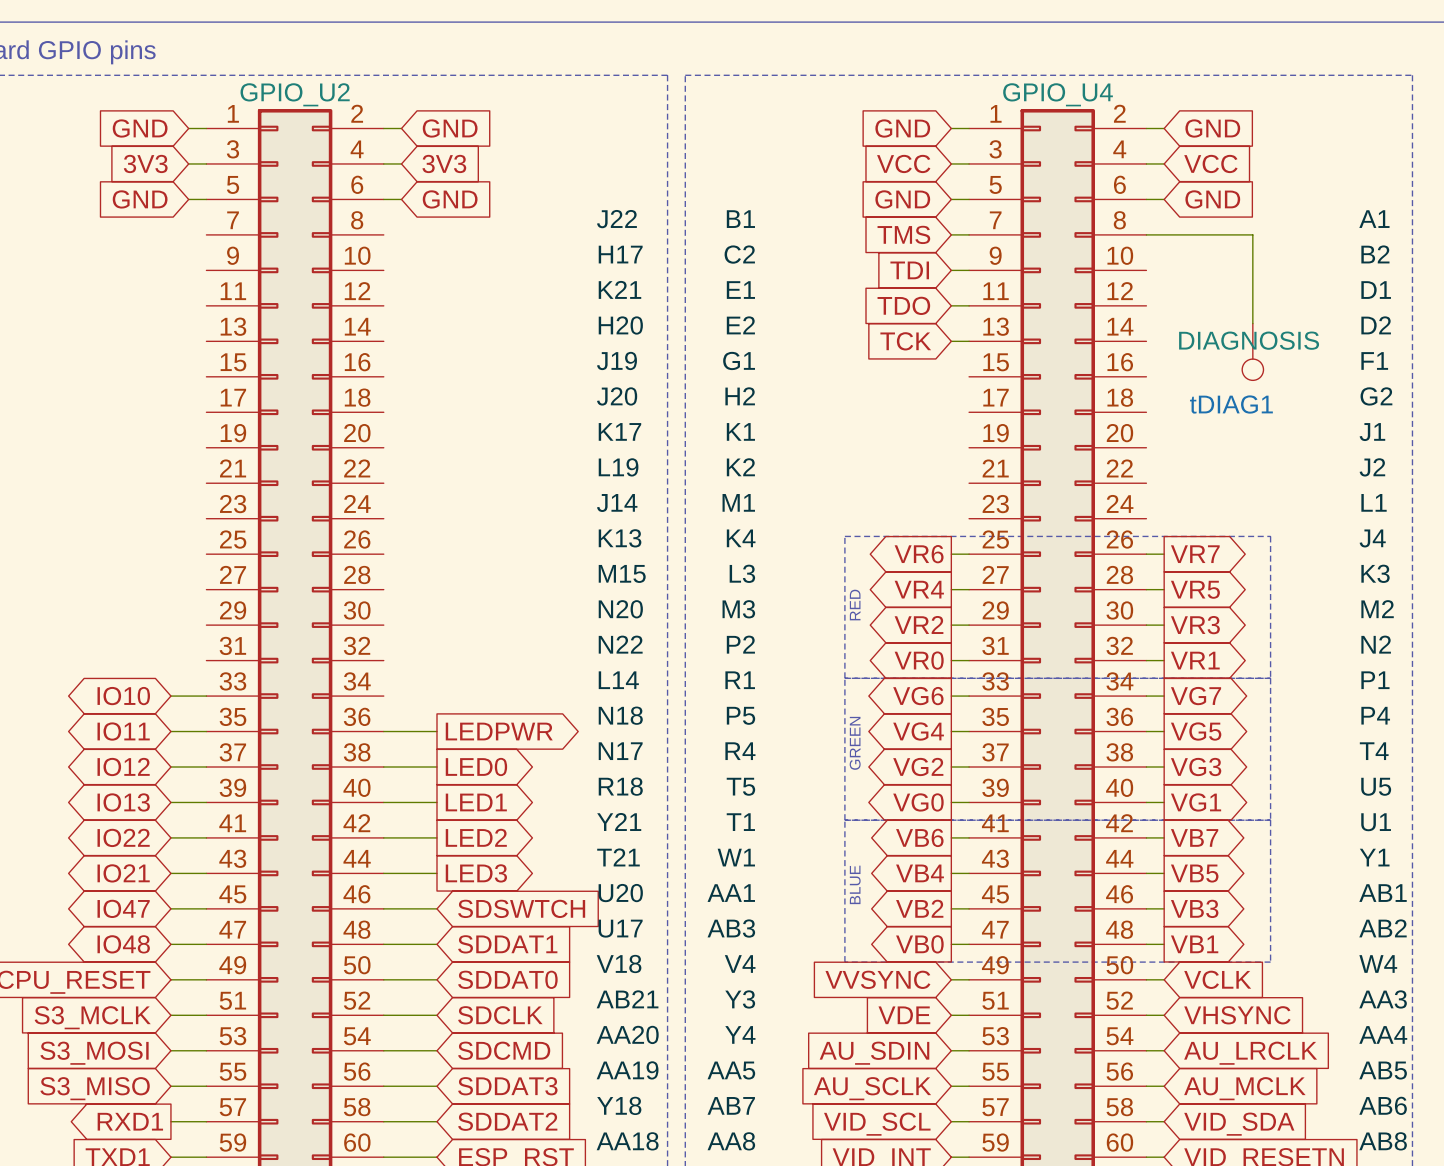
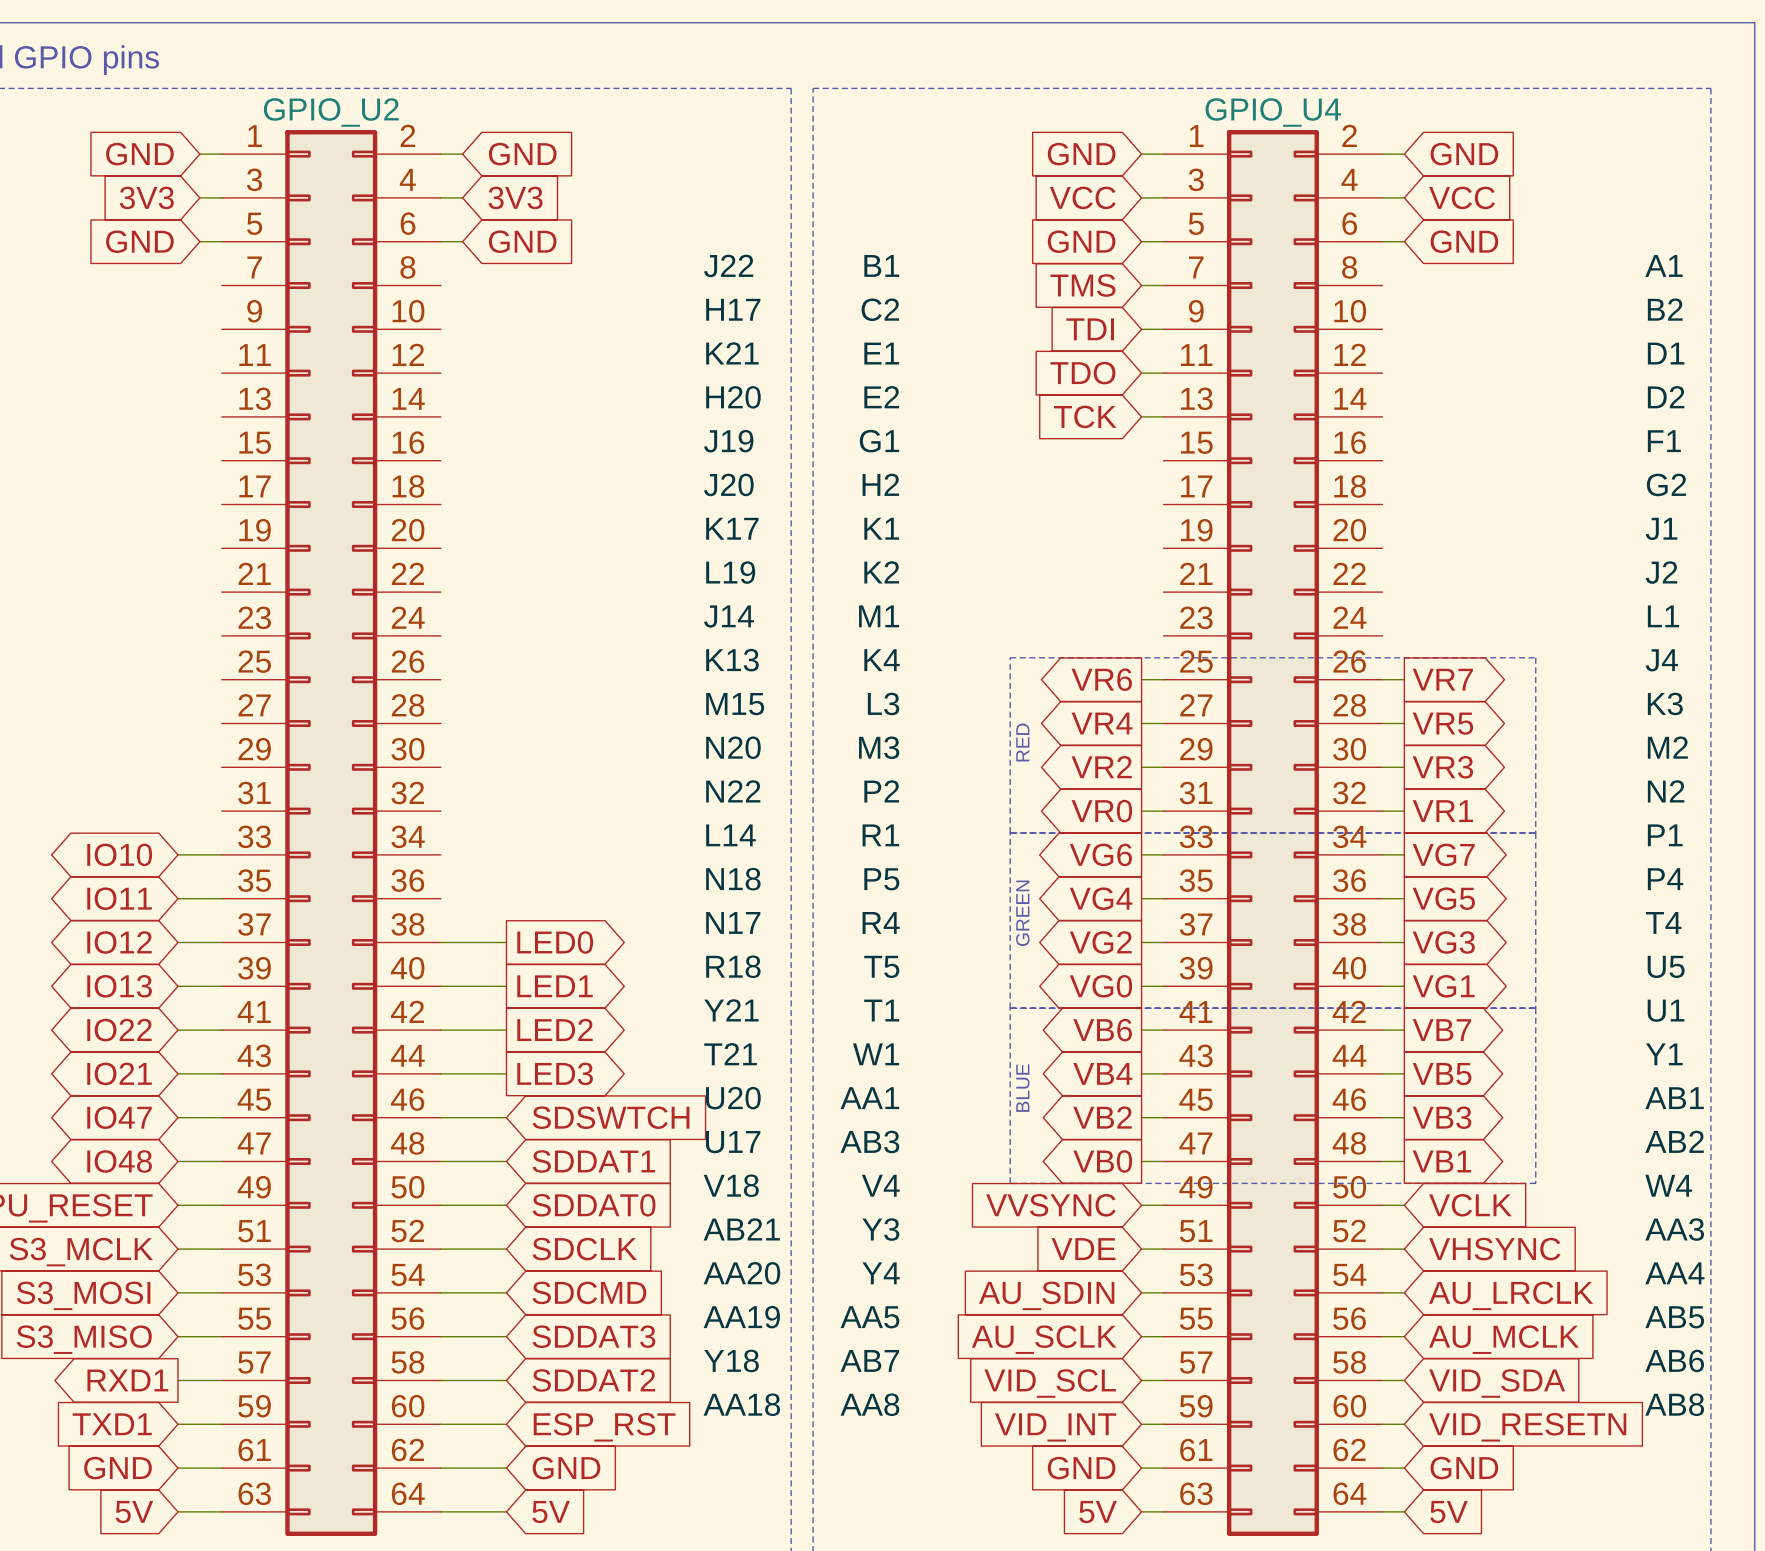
wire: (1146, 234) (1252, 234) (1252, 323) -> none
tDIAG1: DIAGNOSIS (1252, 351) -> none
wire: (383, 731) (436, 731) -> none
global label: LEDPWR (499, 731) -> none

